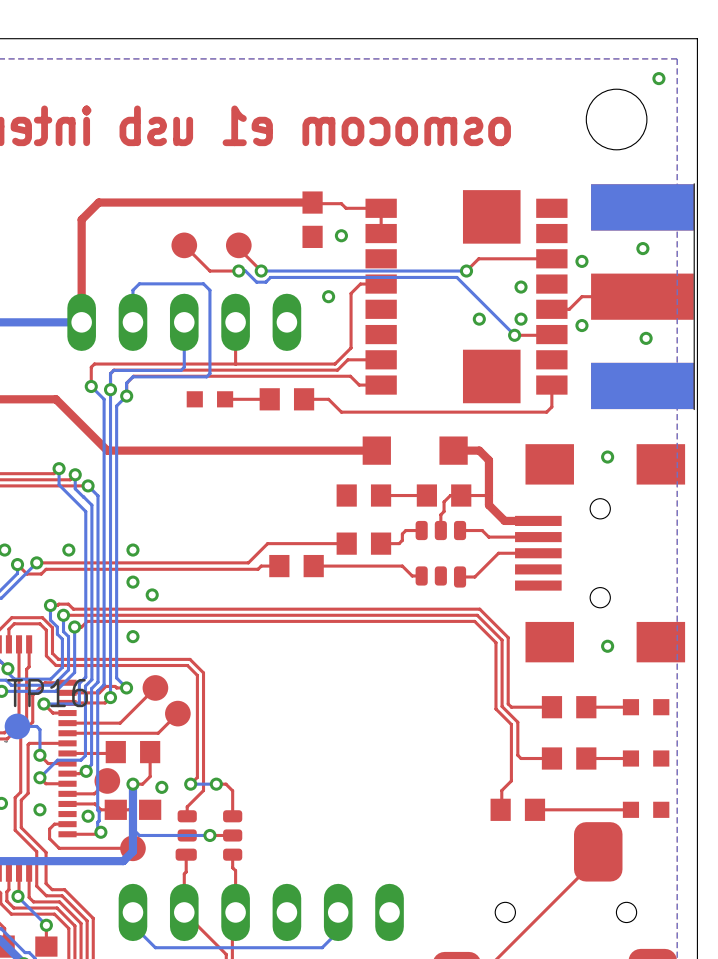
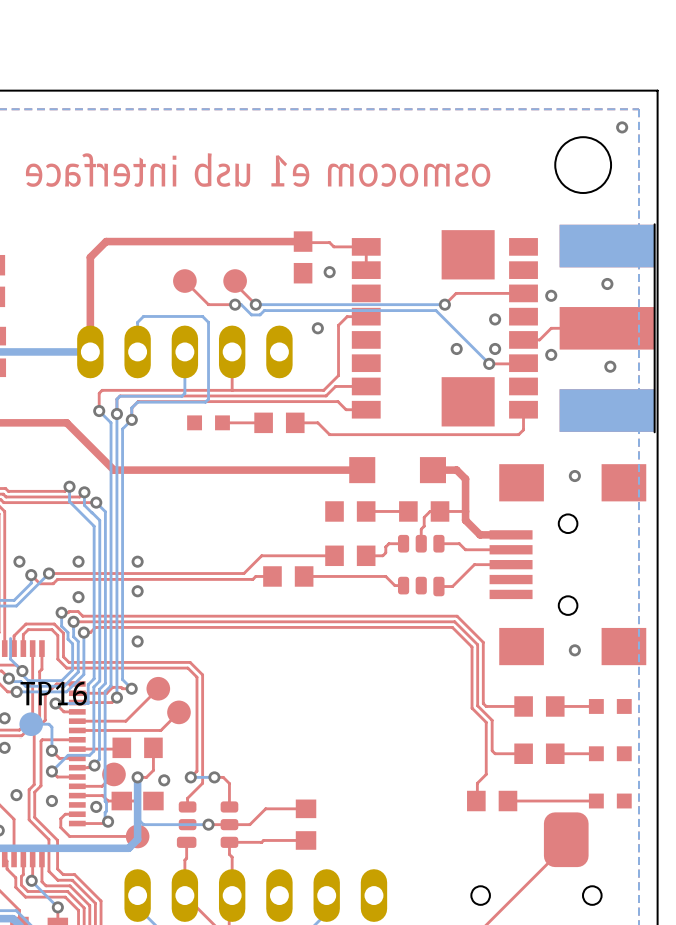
via position: (152, 594) -> (78, 597)
top track: none -> (306, 808) (265, 808) (249, 824) (229, 824)
part: none -> (306, 824)
top track: none -> (306, 840) (229, 842)

